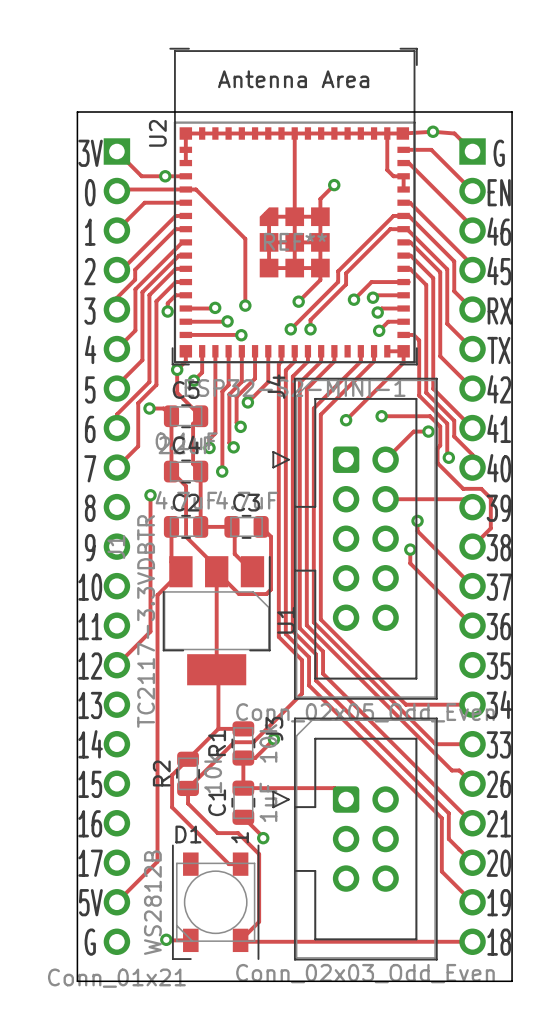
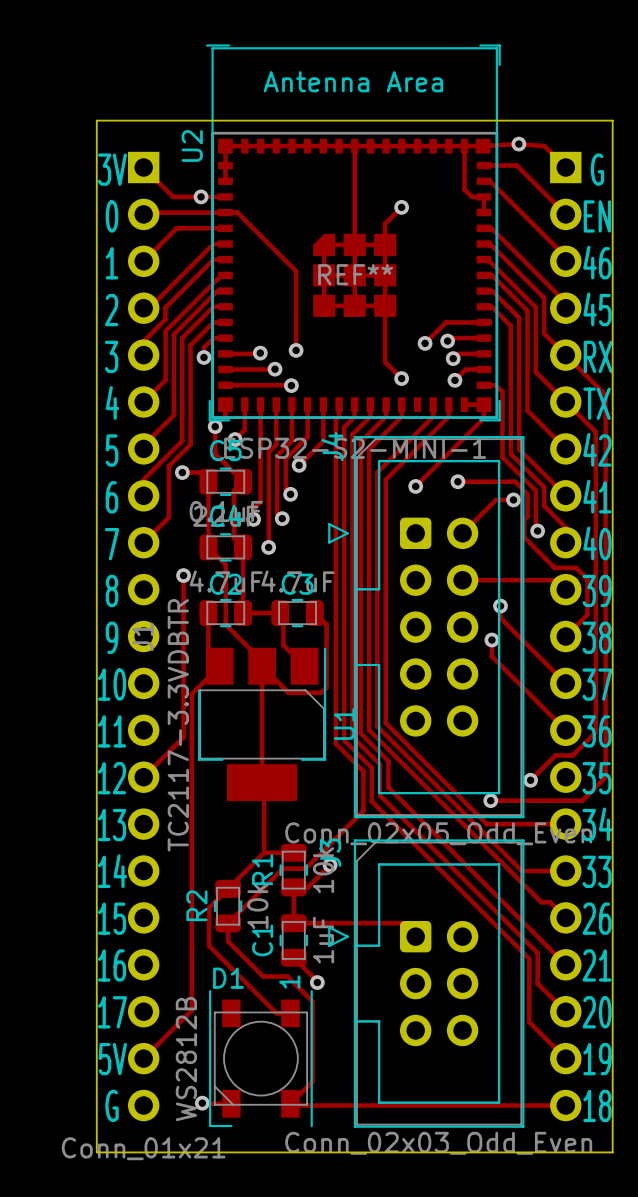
track: (403, 215) (393, 215) (338, 271) (338, 281) (290, 329) -> none
track: (403, 229) (390, 229) (346, 273) (346, 284) (310, 319) (310, 329) -> none
track: (320, 279) (298, 301) -> (385, 319) (385, 362) (401, 378)
via: (298, 301) -> none
track: none -> (565, 355) (605, 394) (605, 777) (582, 800) (490, 800)
via: (290, 329) -> none
via: (310, 329) -> none
via: none -> (401, 378)
track: none -> (565, 402) (595, 432) (595, 732) (572, 755) (555, 755) (530, 780)
via: none -> (530, 780)
via: none -> (490, 800)

